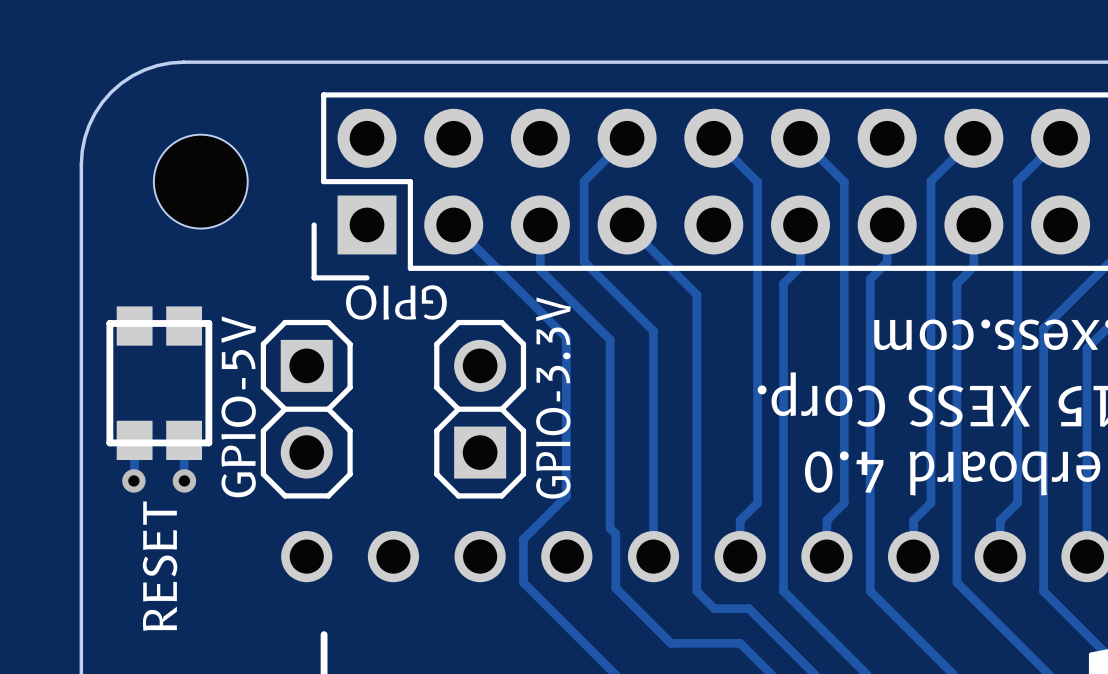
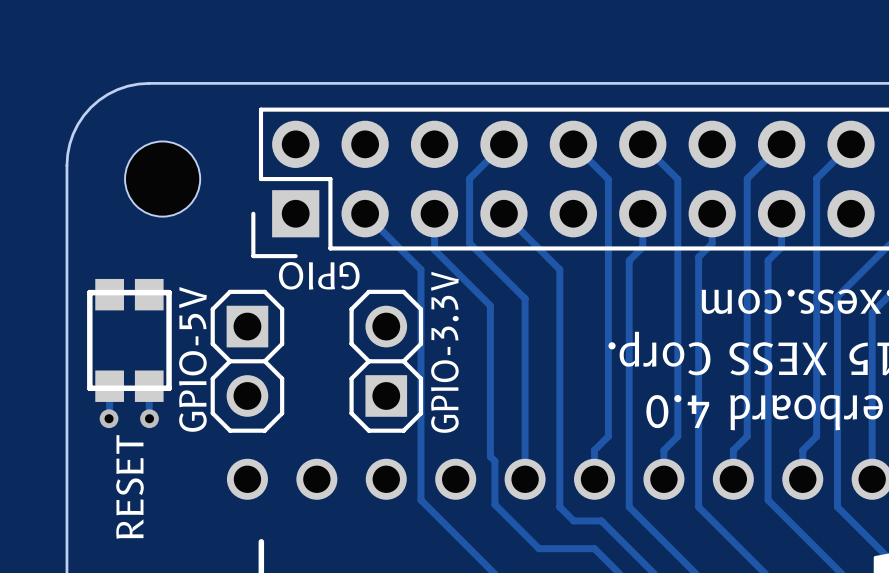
track: (523, 294) (566, 337) (566, 496) (523, 539) -> (420, 269) (420, 465)

